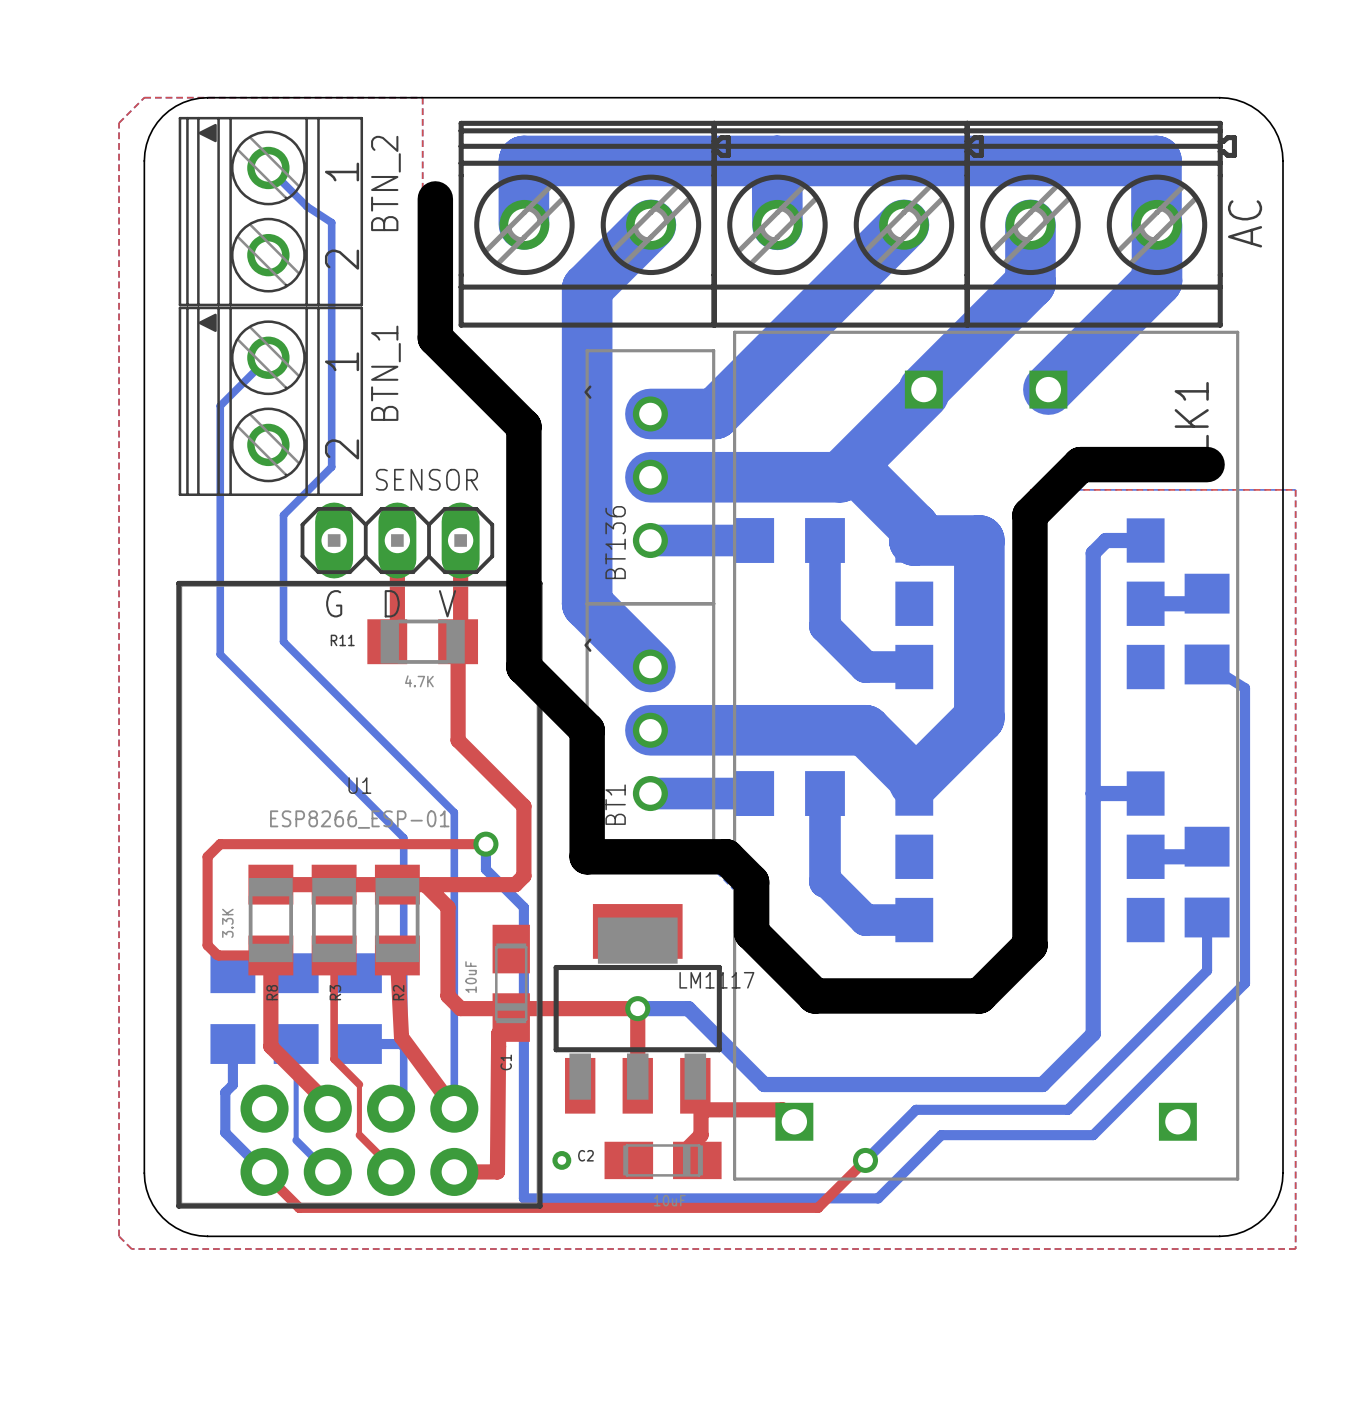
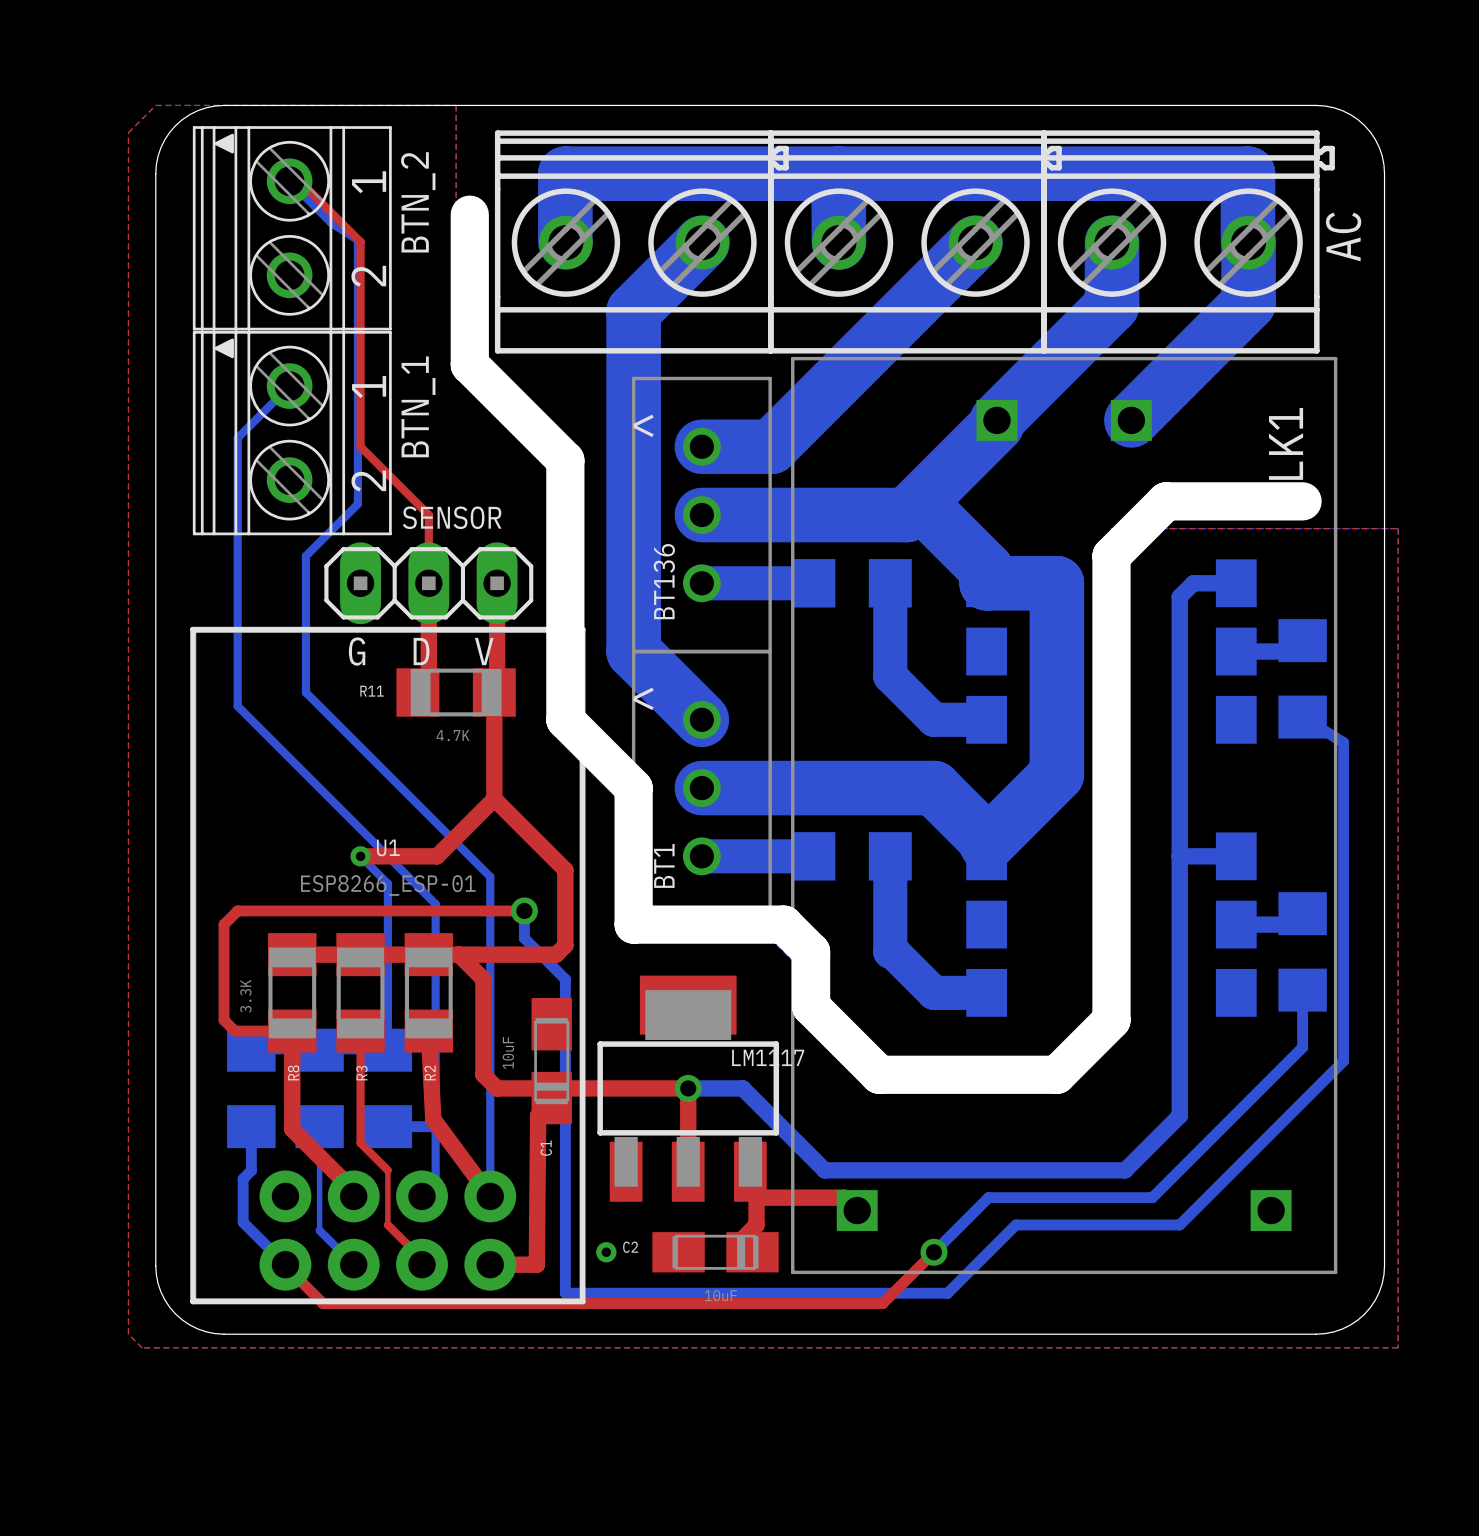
top track: none -> (289, 181) (299, 181) (360, 241) (360, 446) (428, 515) (428, 583)
top track: none -> (494, 798) (437, 856) (360, 856)
bottom track: none -> (360, 856) (387, 883) (387, 1050) (251, 1050)
via: none -> (360, 856)

